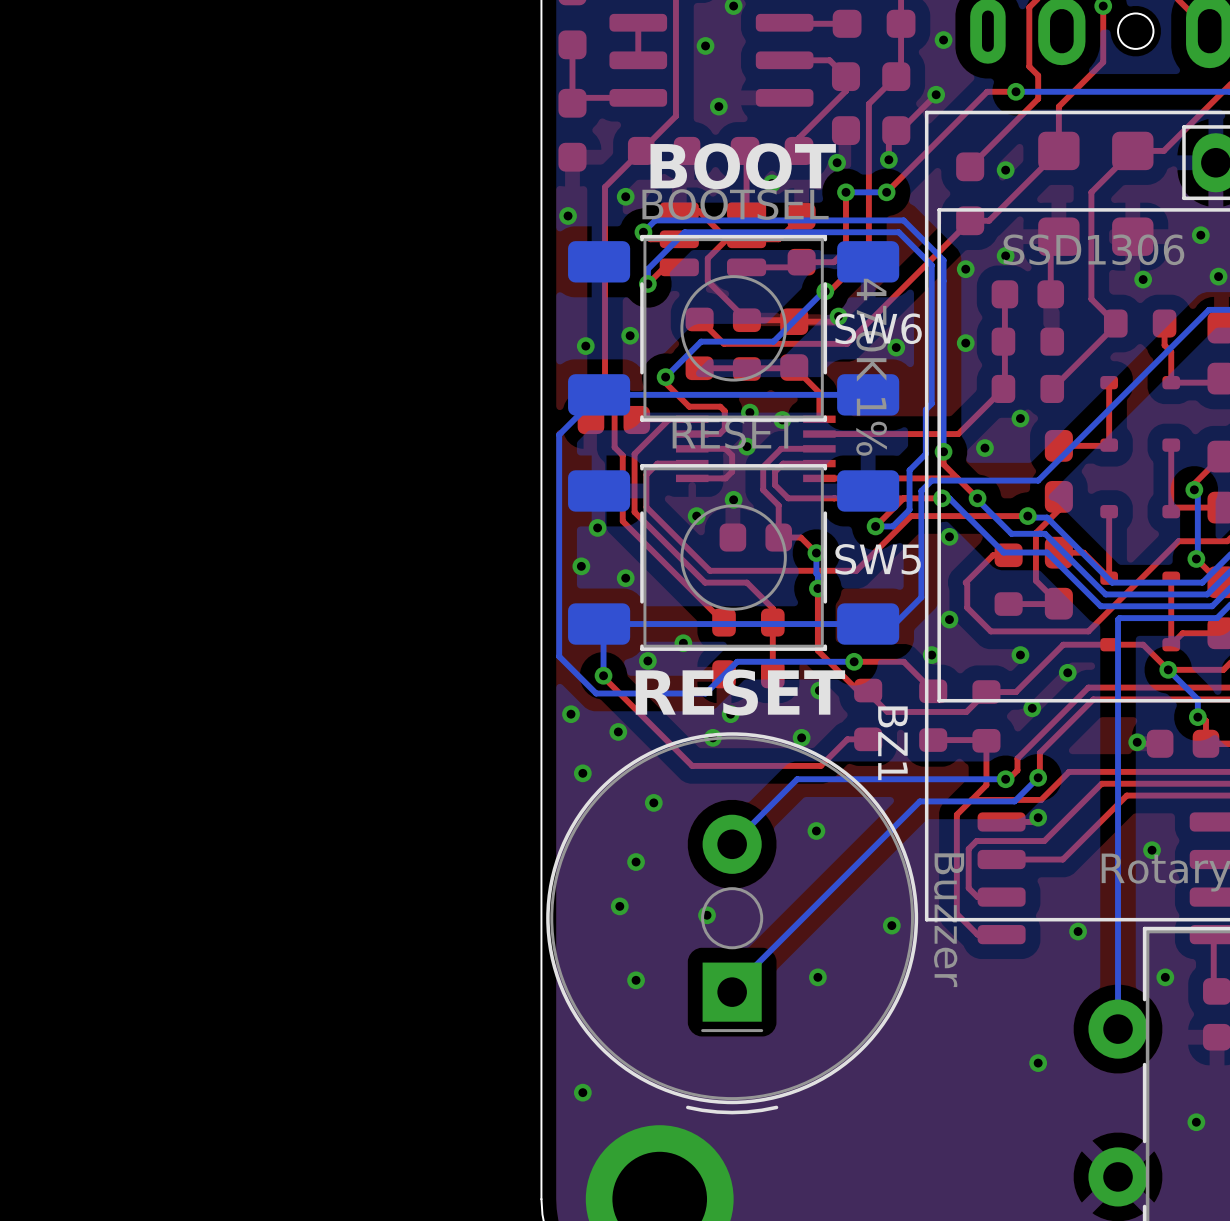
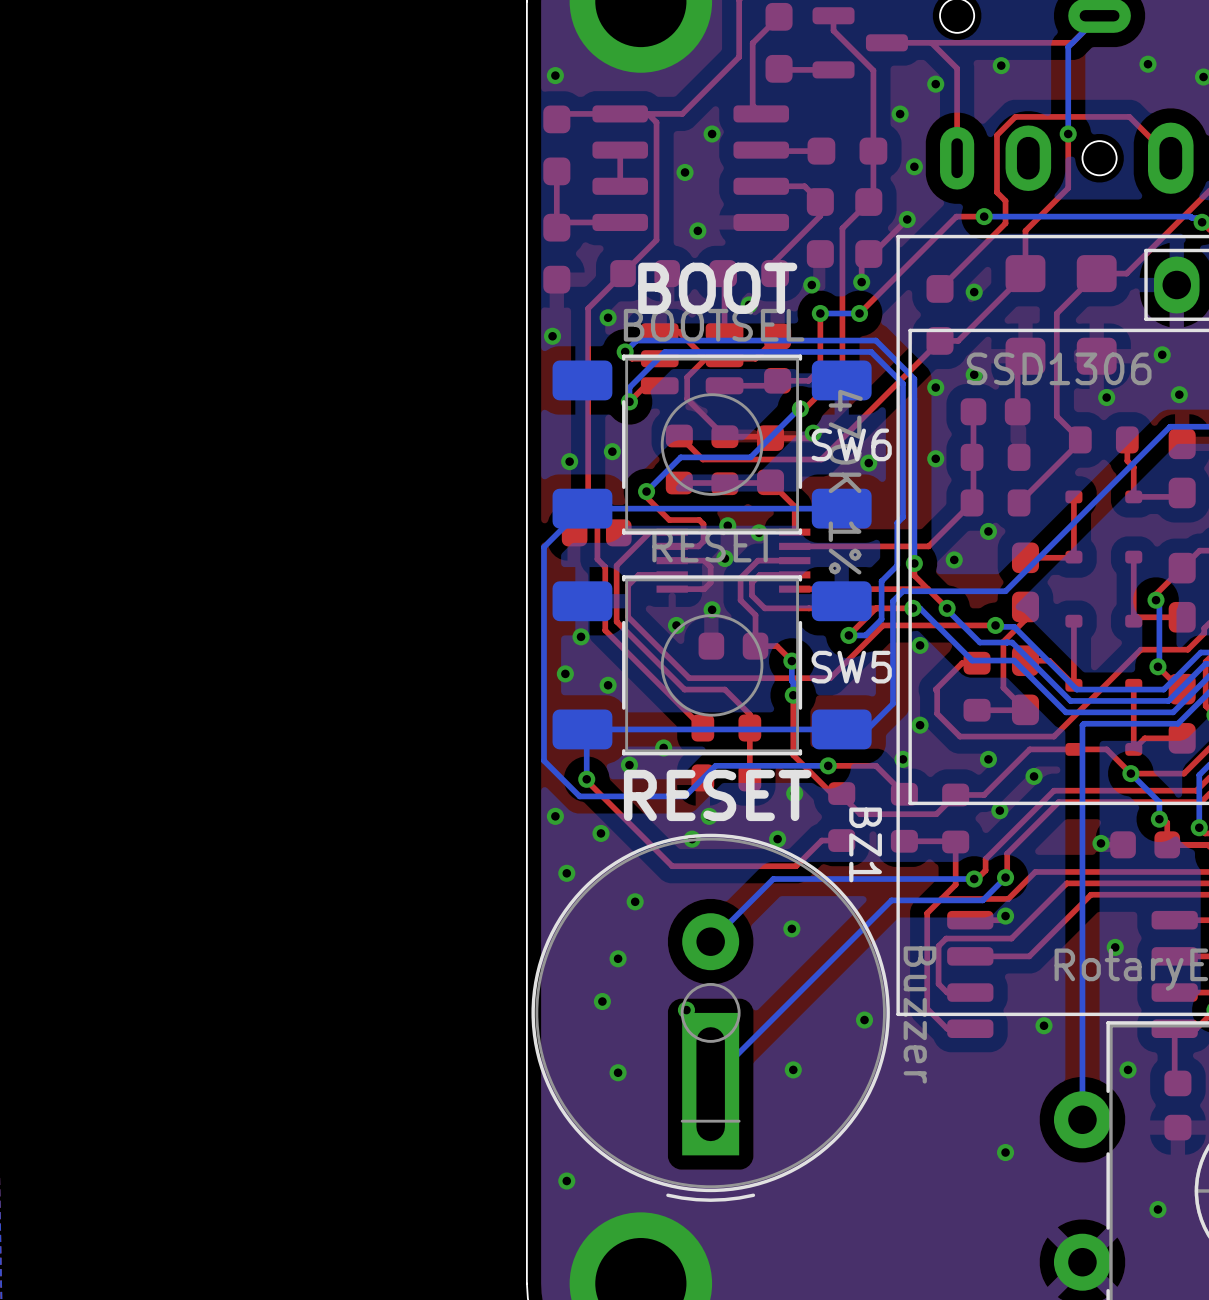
BZ1 footprint: [546, 732, 919, 1115] -> [531, 833, 890, 1202]

